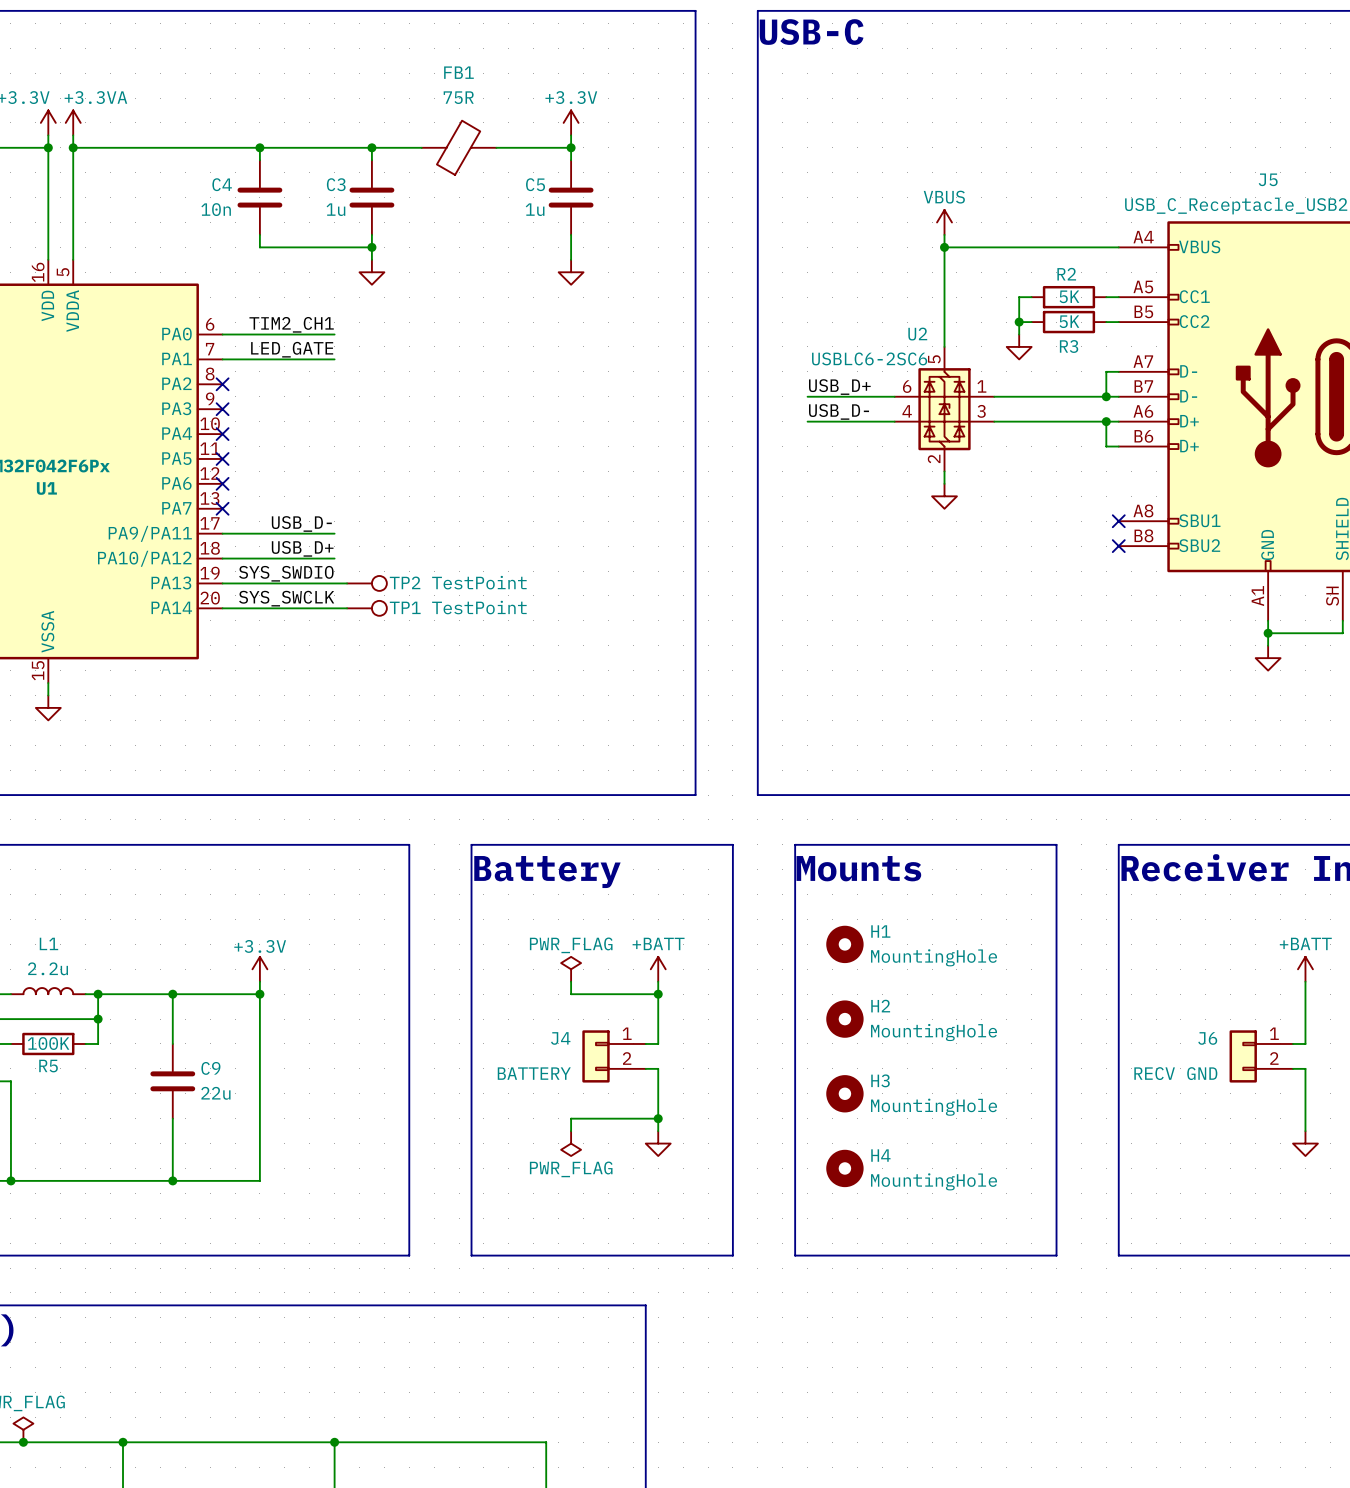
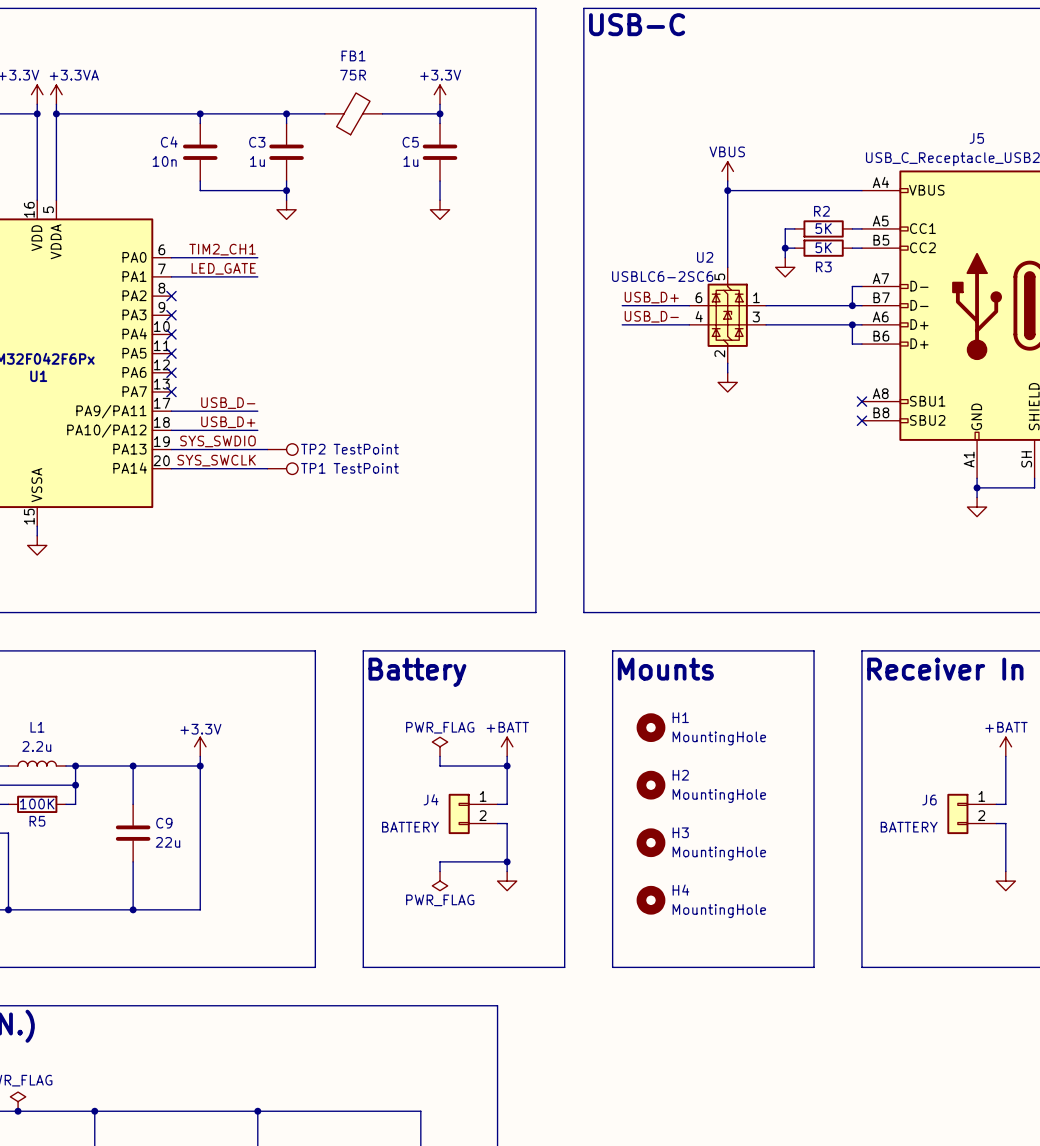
J6 value: RECV GND (1175, 1073) -> BATTERY (909, 827)

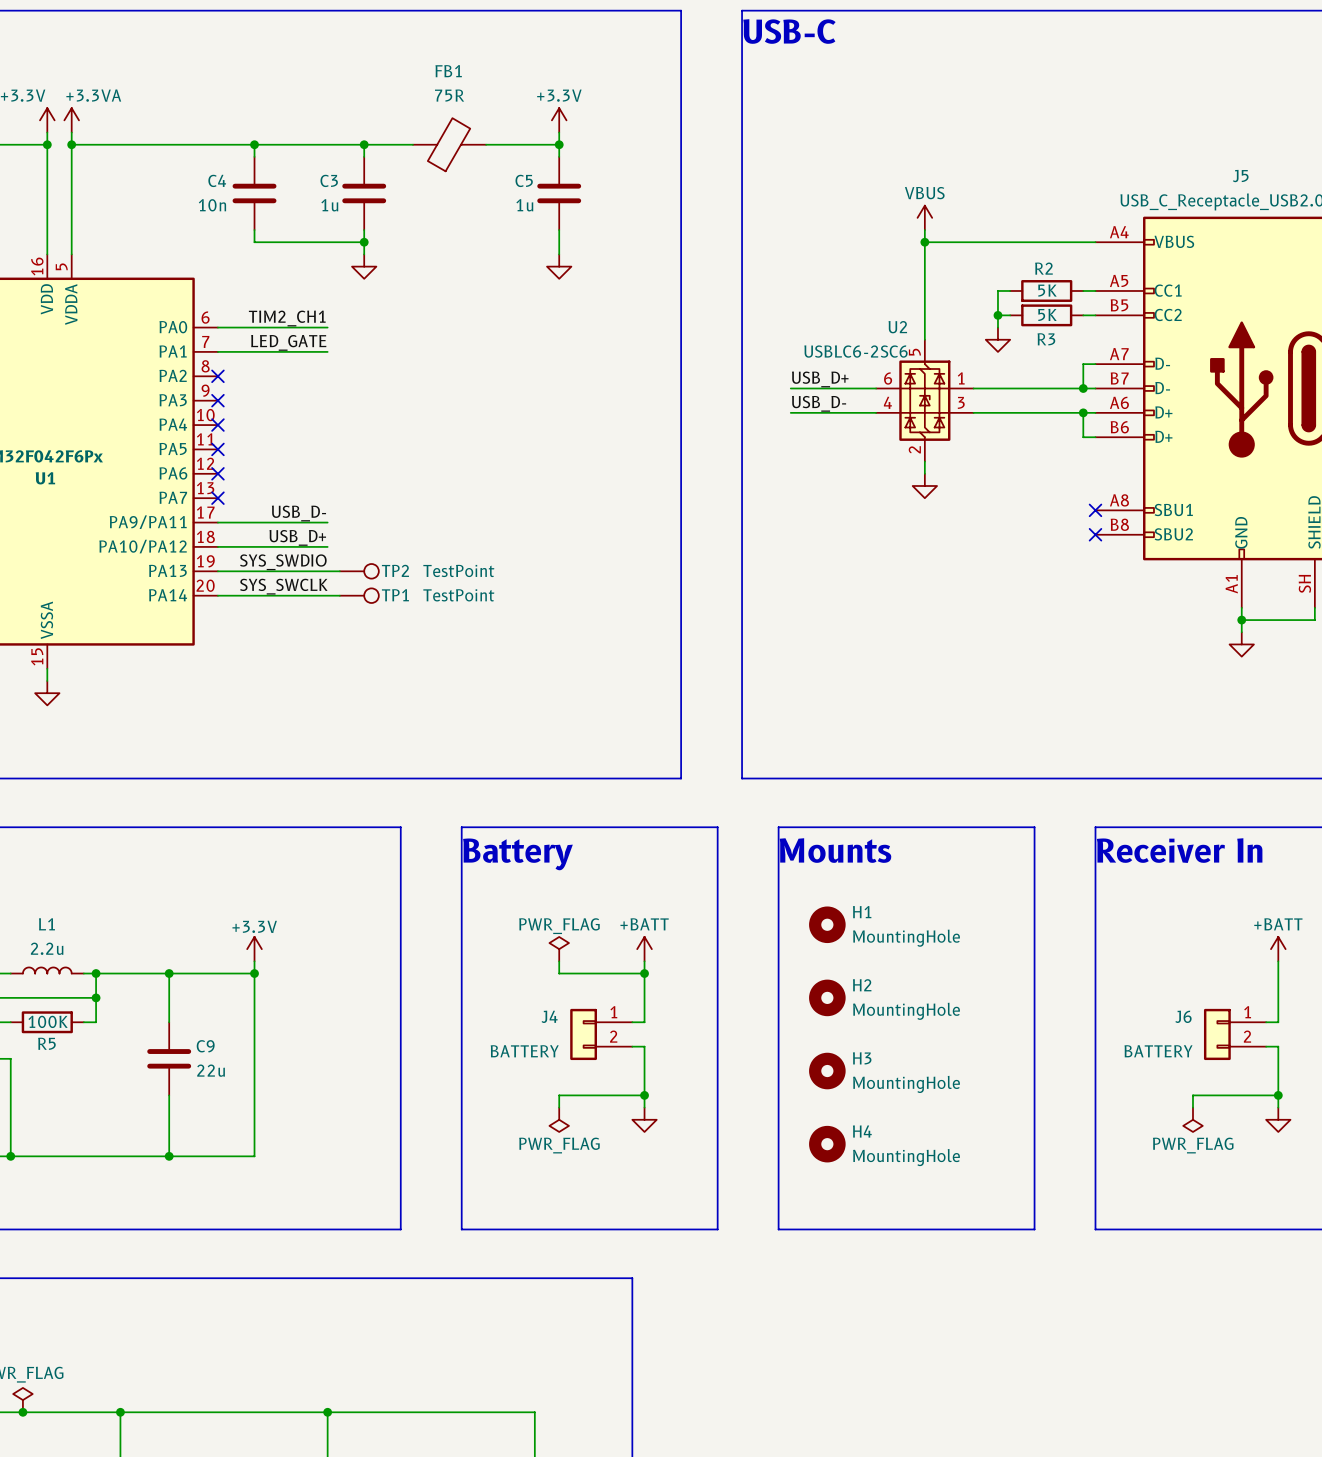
wire: none -> (1278, 1095) (1192, 1095) (1192, 1107)
junction: none -> (1278, 1095)
power symbol: none -> PWR_FLAG (1192, 1119)

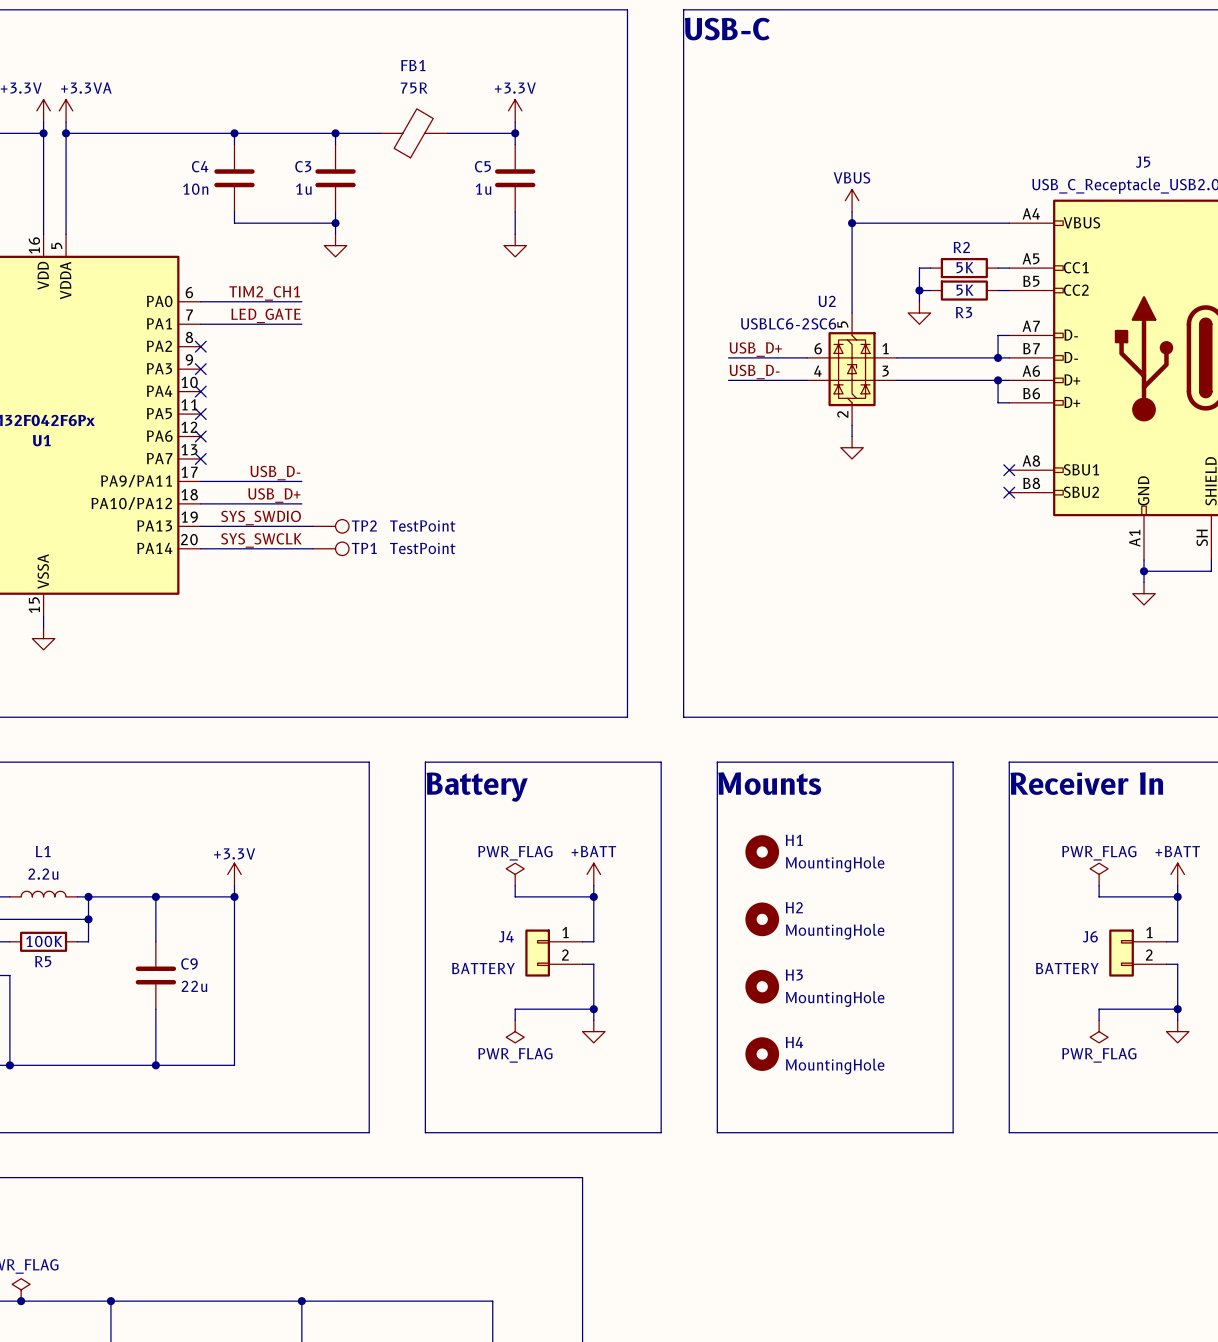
power symbol: none -> PWR_FLAG (1099, 874)
wire: none -> (1099, 885) (1099, 896) (1177, 896)
junction: none -> (1177, 896)

